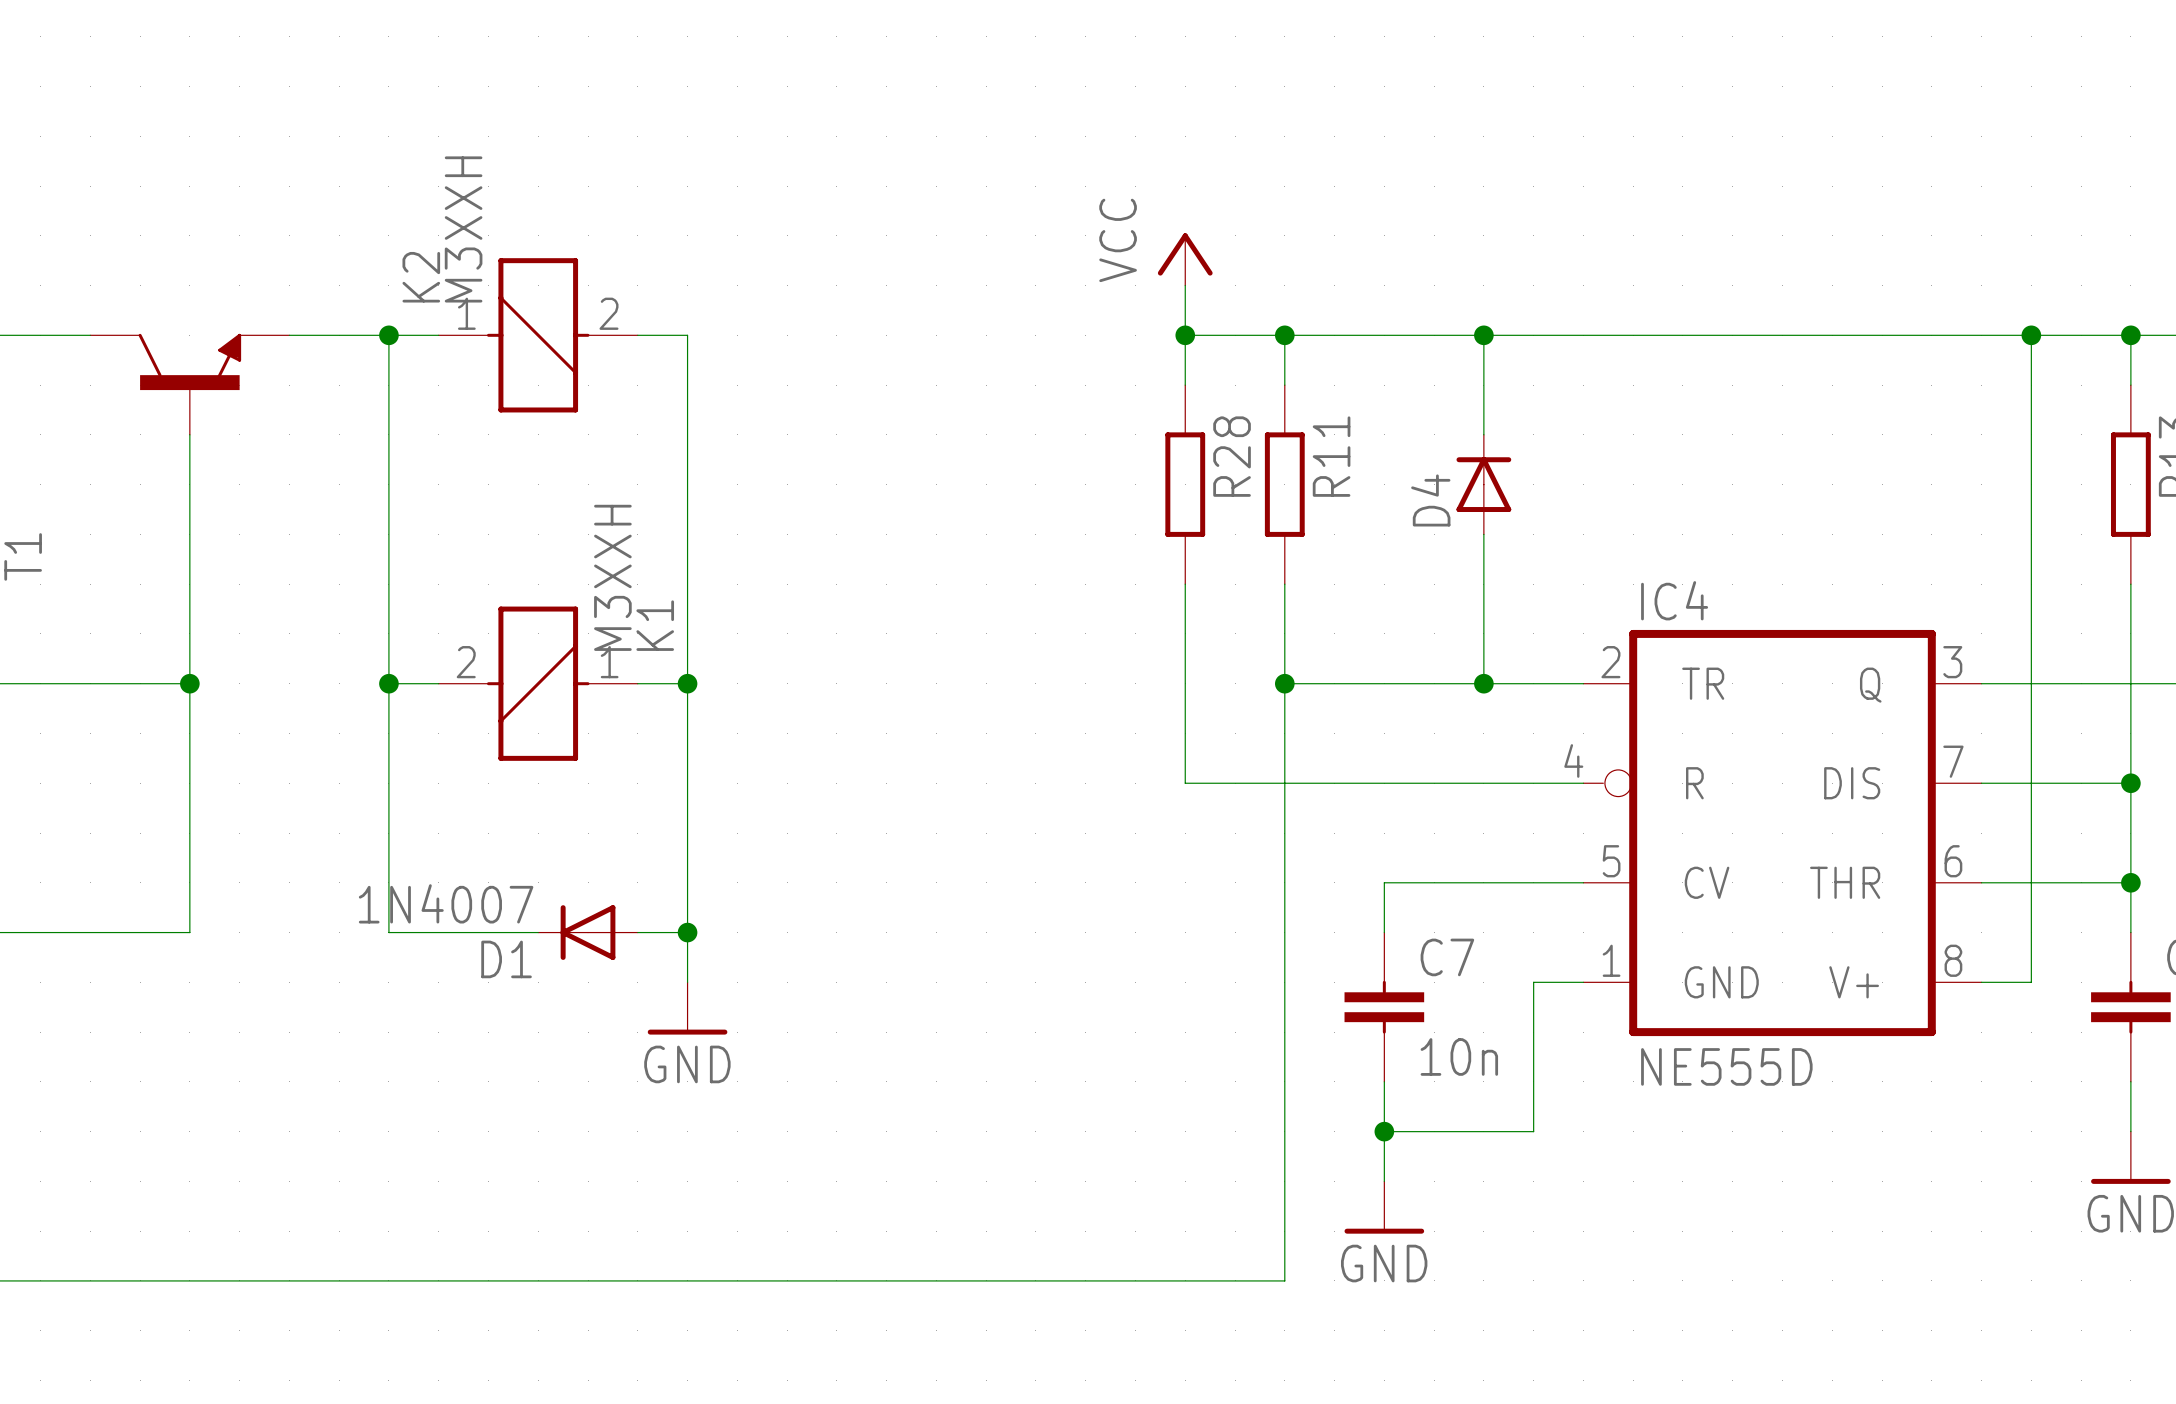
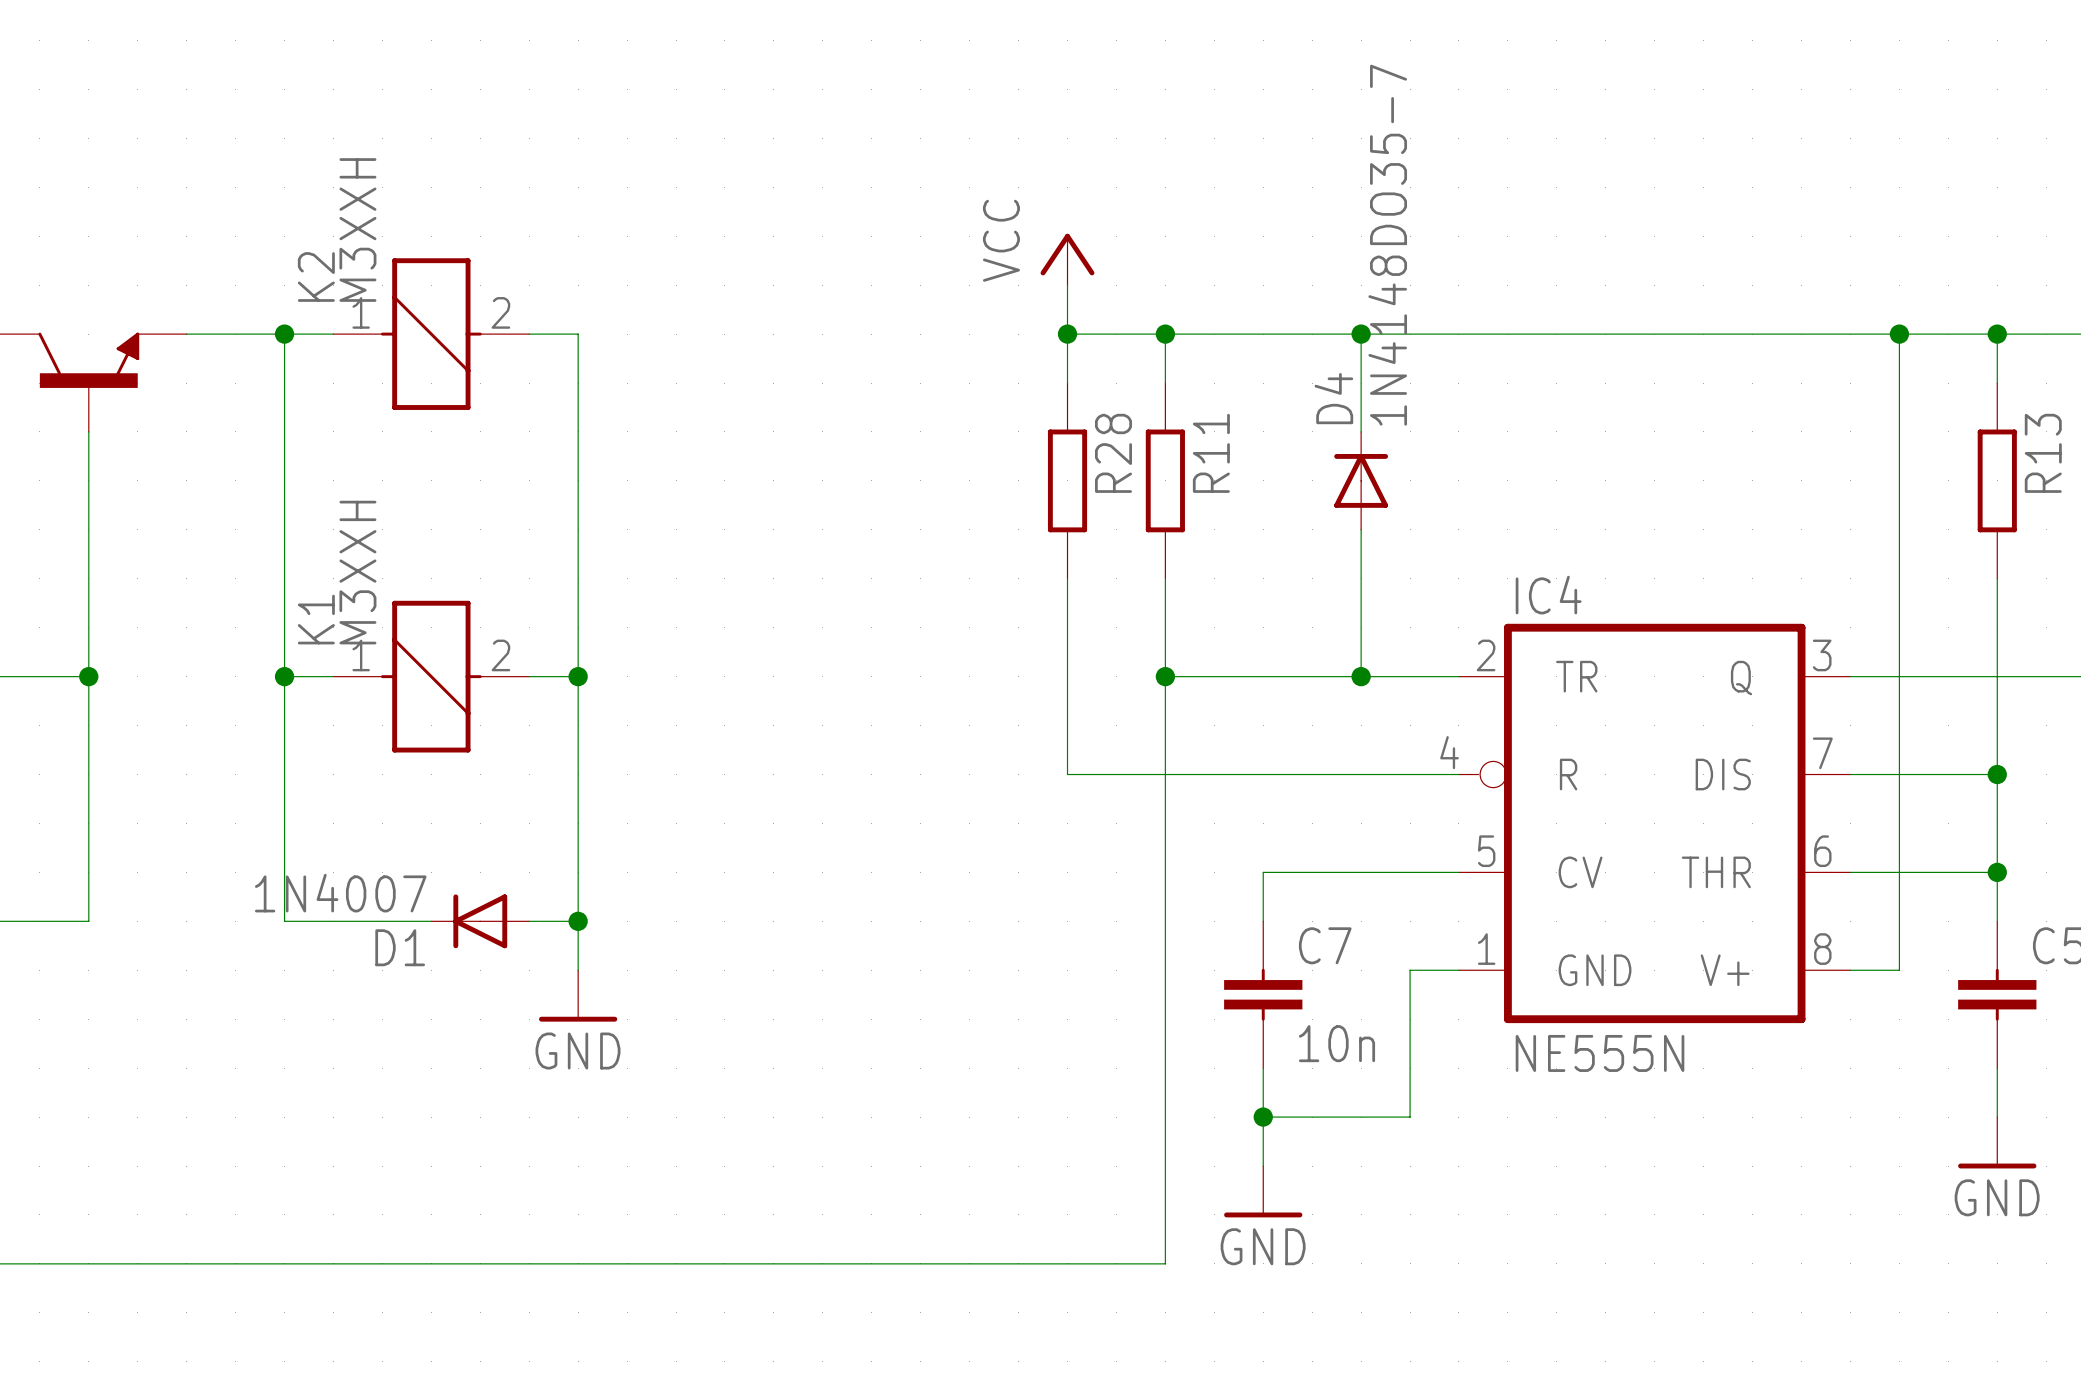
D4 value: none -> 1N4148DO35-7 (1387, 245)
D4 name position: D4 (1430, 500) -> D4 (1333, 398)
K1 flip: as is (538, 683) -> left-right (431, 676)
IC4 value: NE555D (1726, 1066) -> NE555N (1600, 1053)

